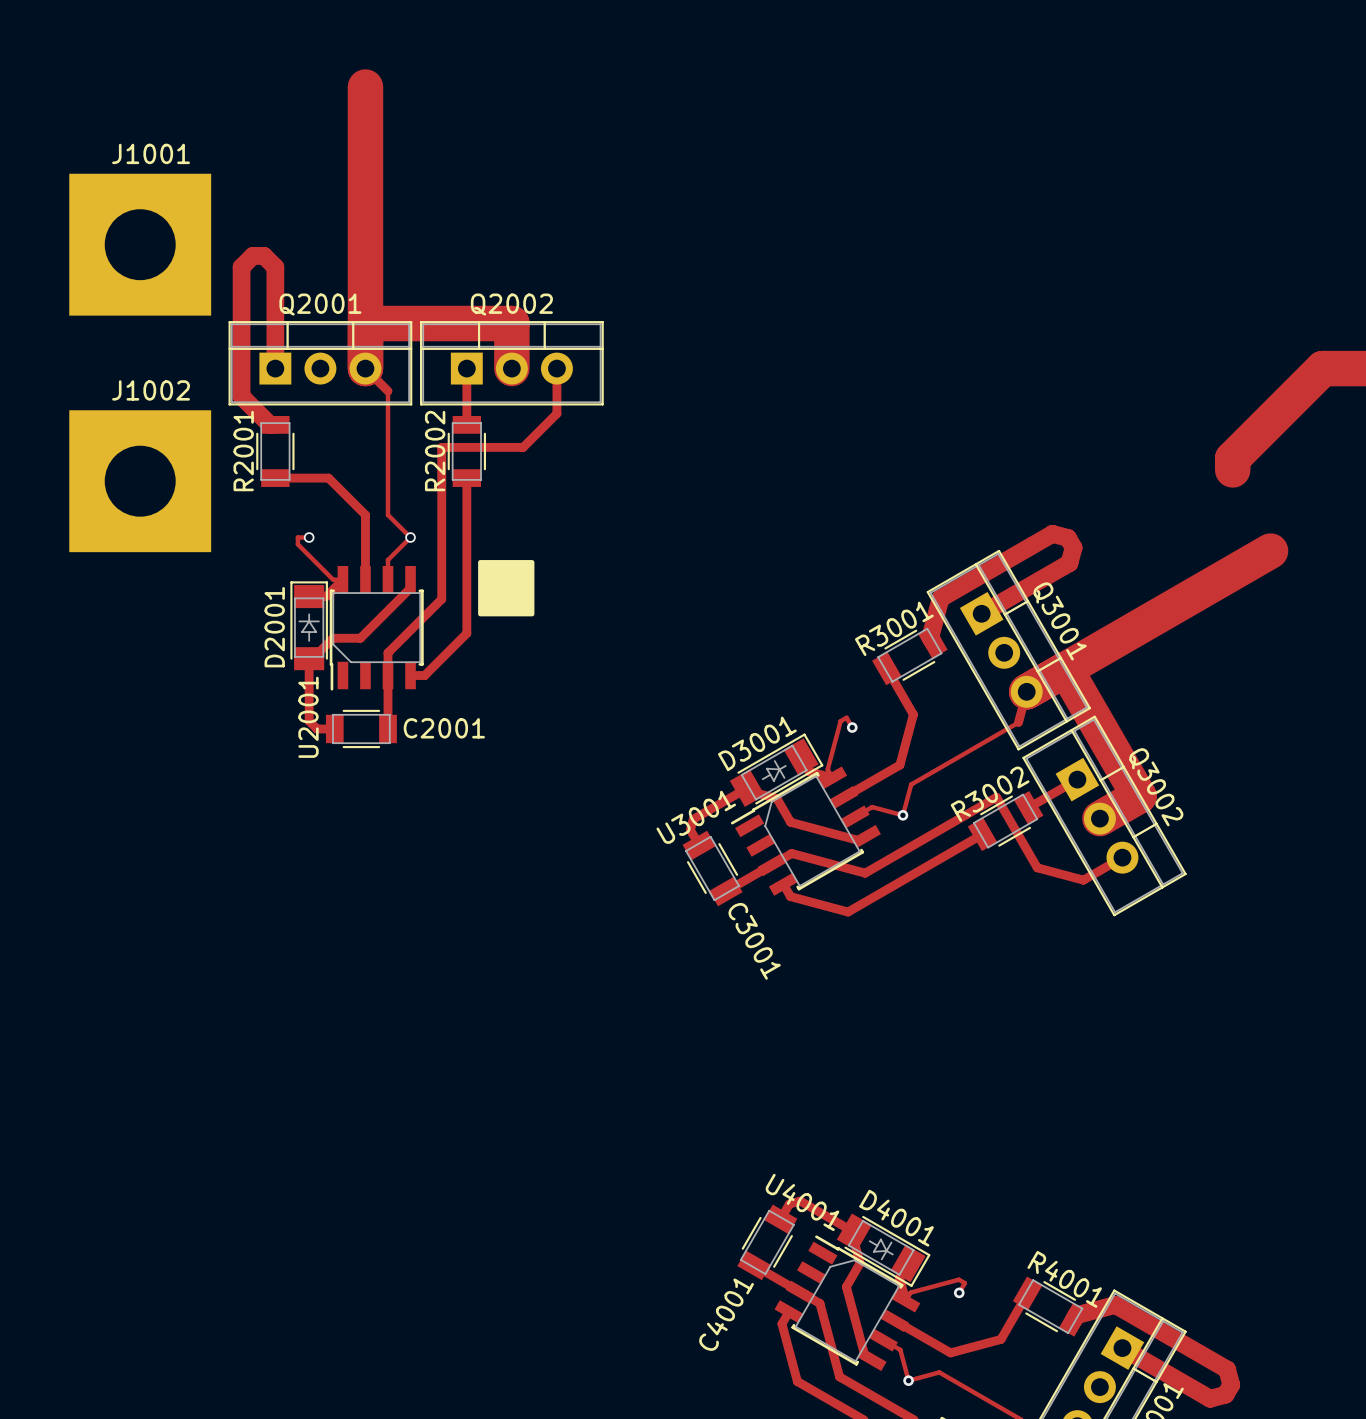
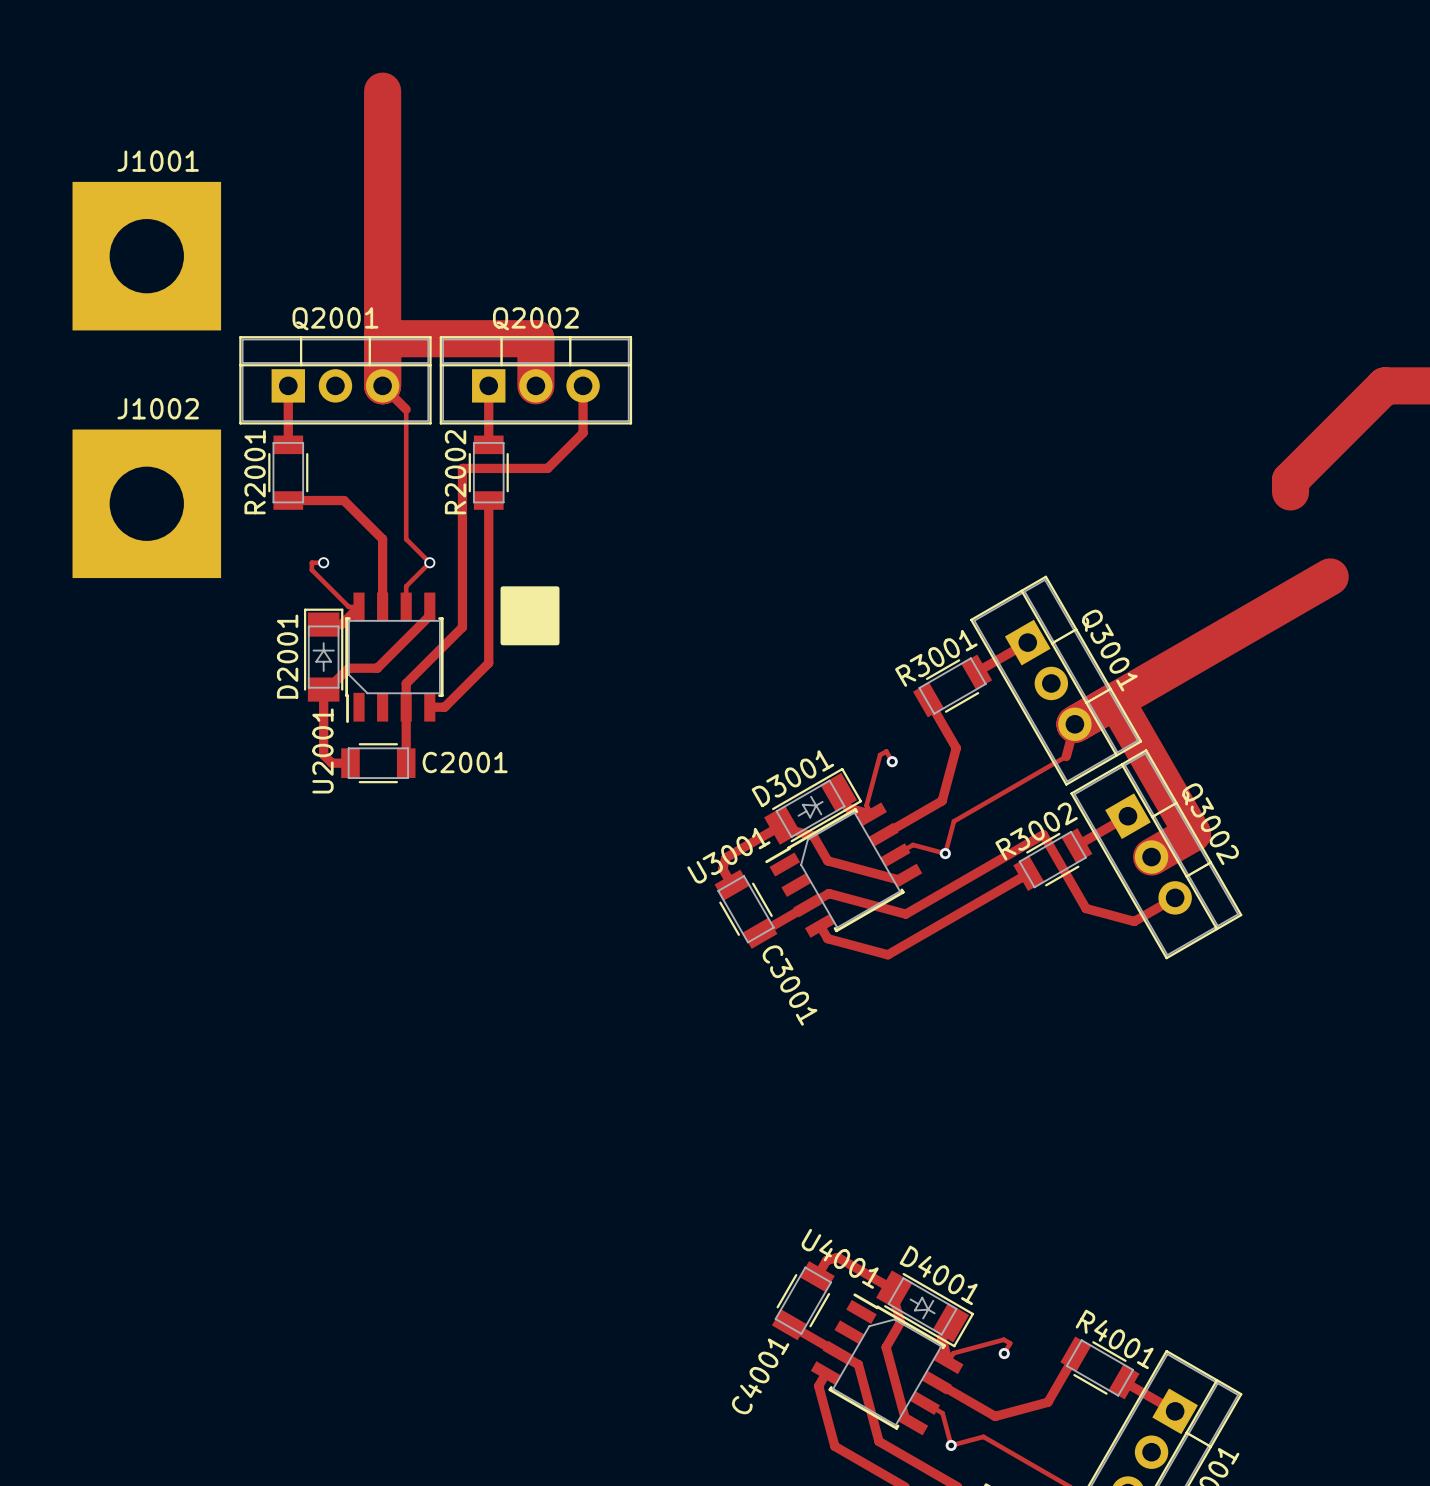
track: (275, 368) (275, 267) (264, 255) (252, 255) (241, 267) (241, 396) (270, 424) (275, 424) -> (288, 385) (288, 444)
track: (981, 613) (1069, 563) (1073, 547) (1067, 537) (1052, 533) (940, 598) (930, 637) (932, 641) -> (1027, 642) (976, 672)
track: (1073, 1319) (1076, 1315) (1115, 1304) (1227, 1369) (1231, 1384) (1225, 1394) (1210, 1398) (1122, 1348) -> (1124, 1381) (1175, 1411)

